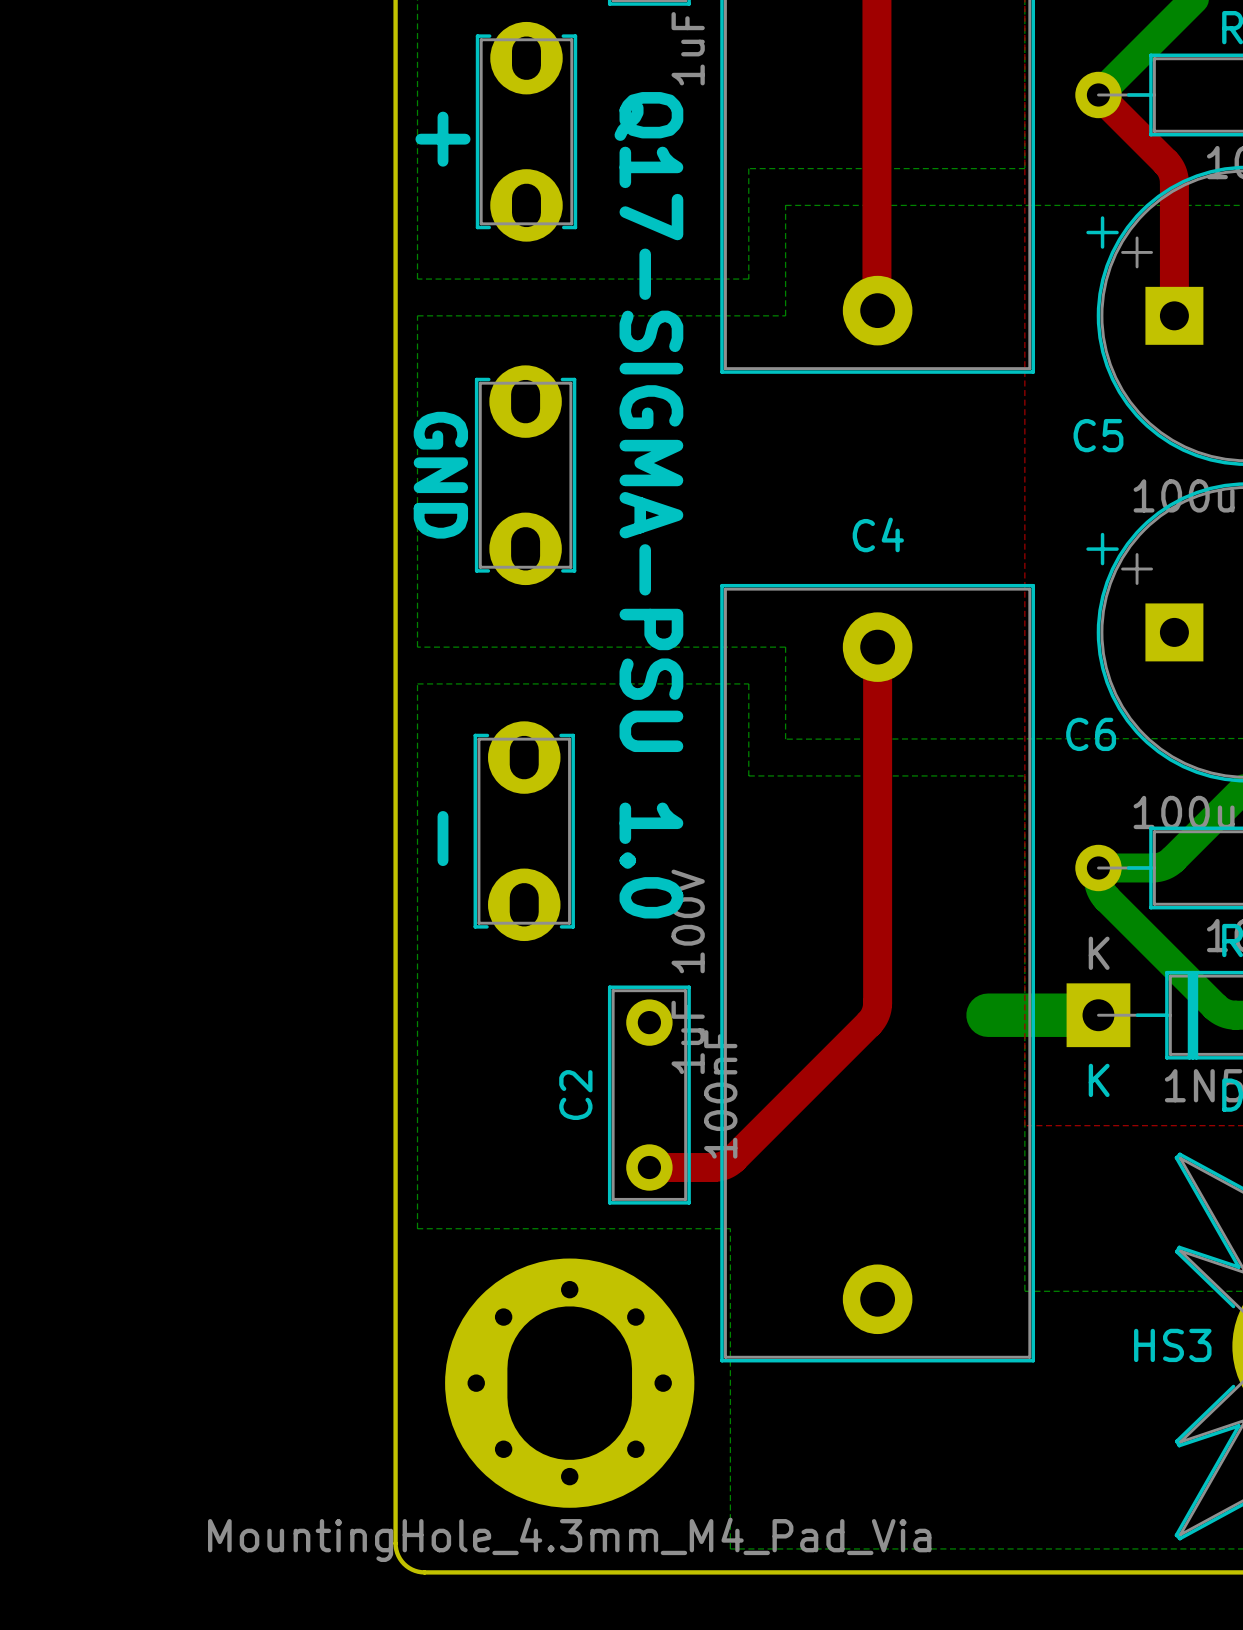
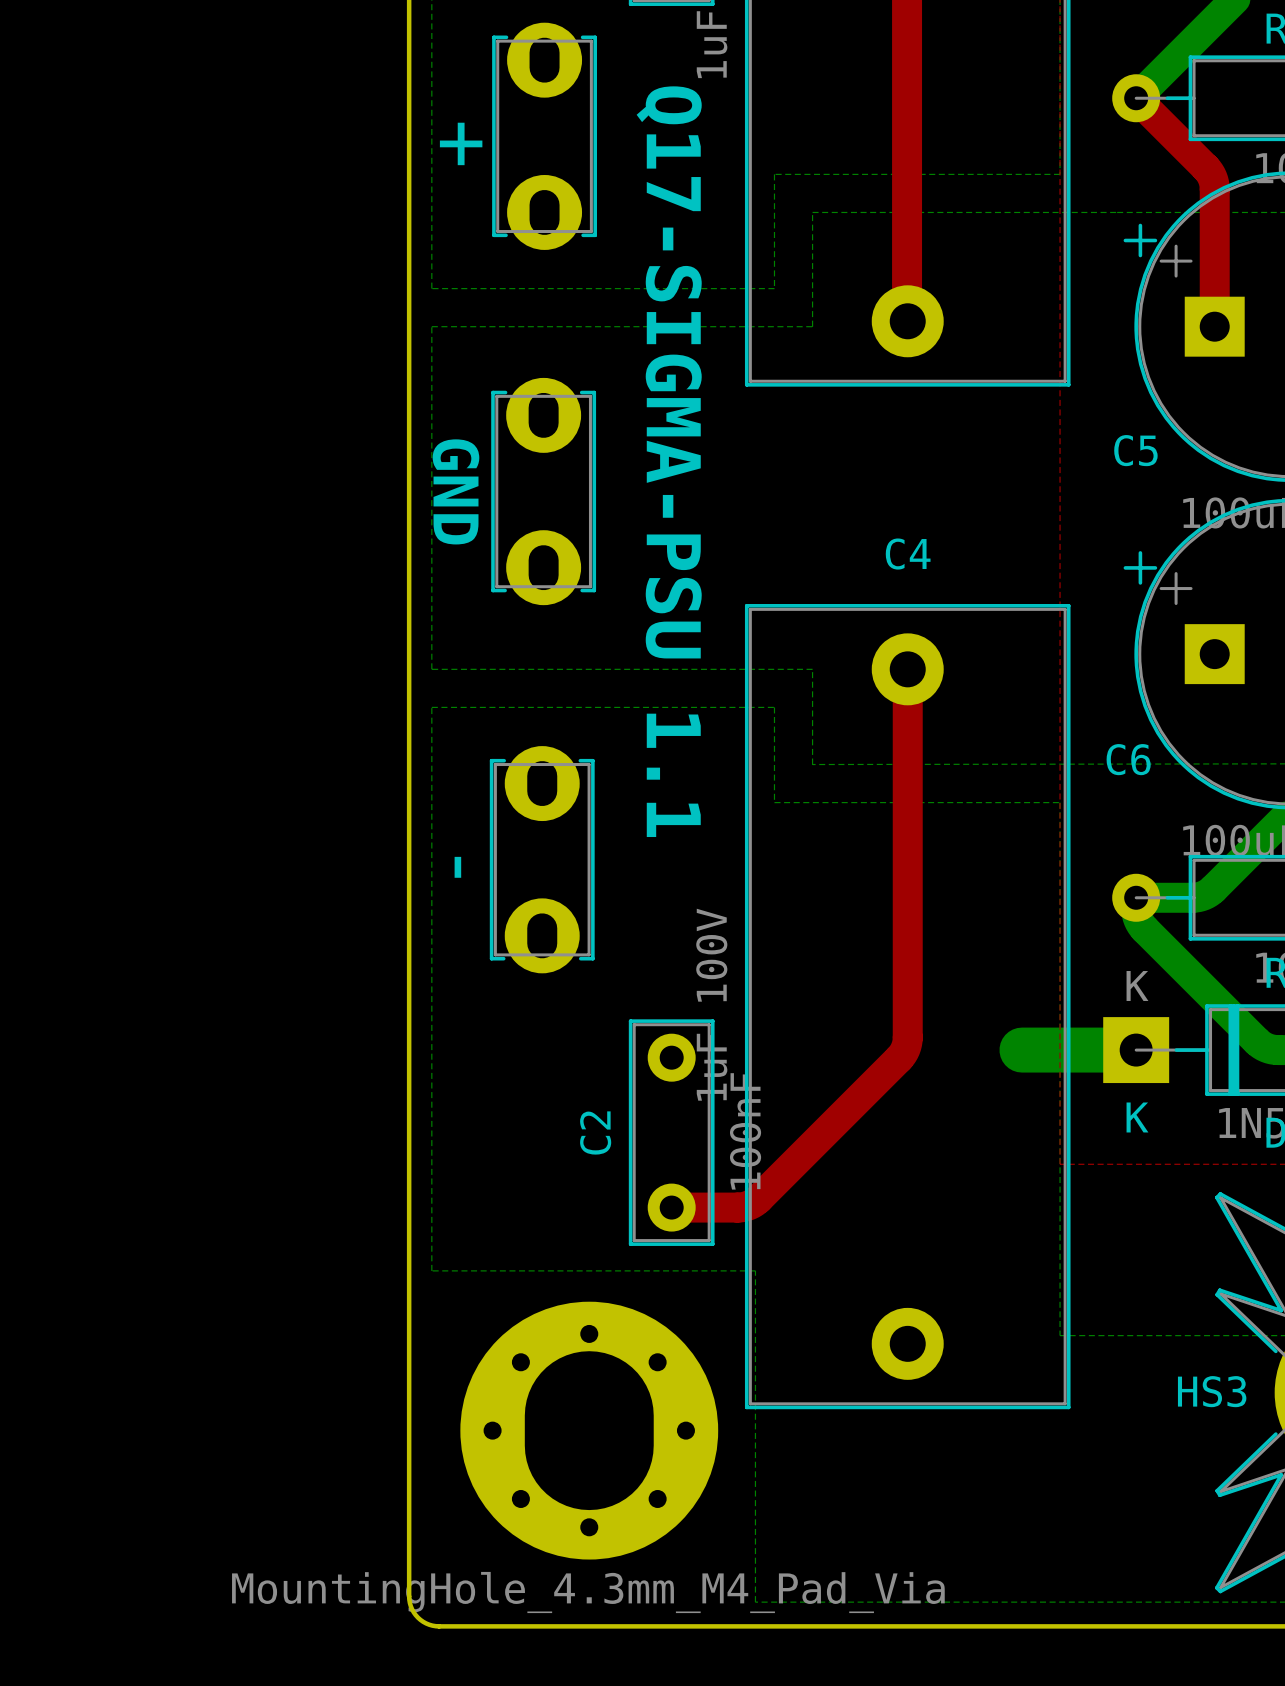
text: Q17-SIGMA-PSU 1.0 (648, 505) -> Q17-SIGMA-PSU 1.1 (669, 461)

